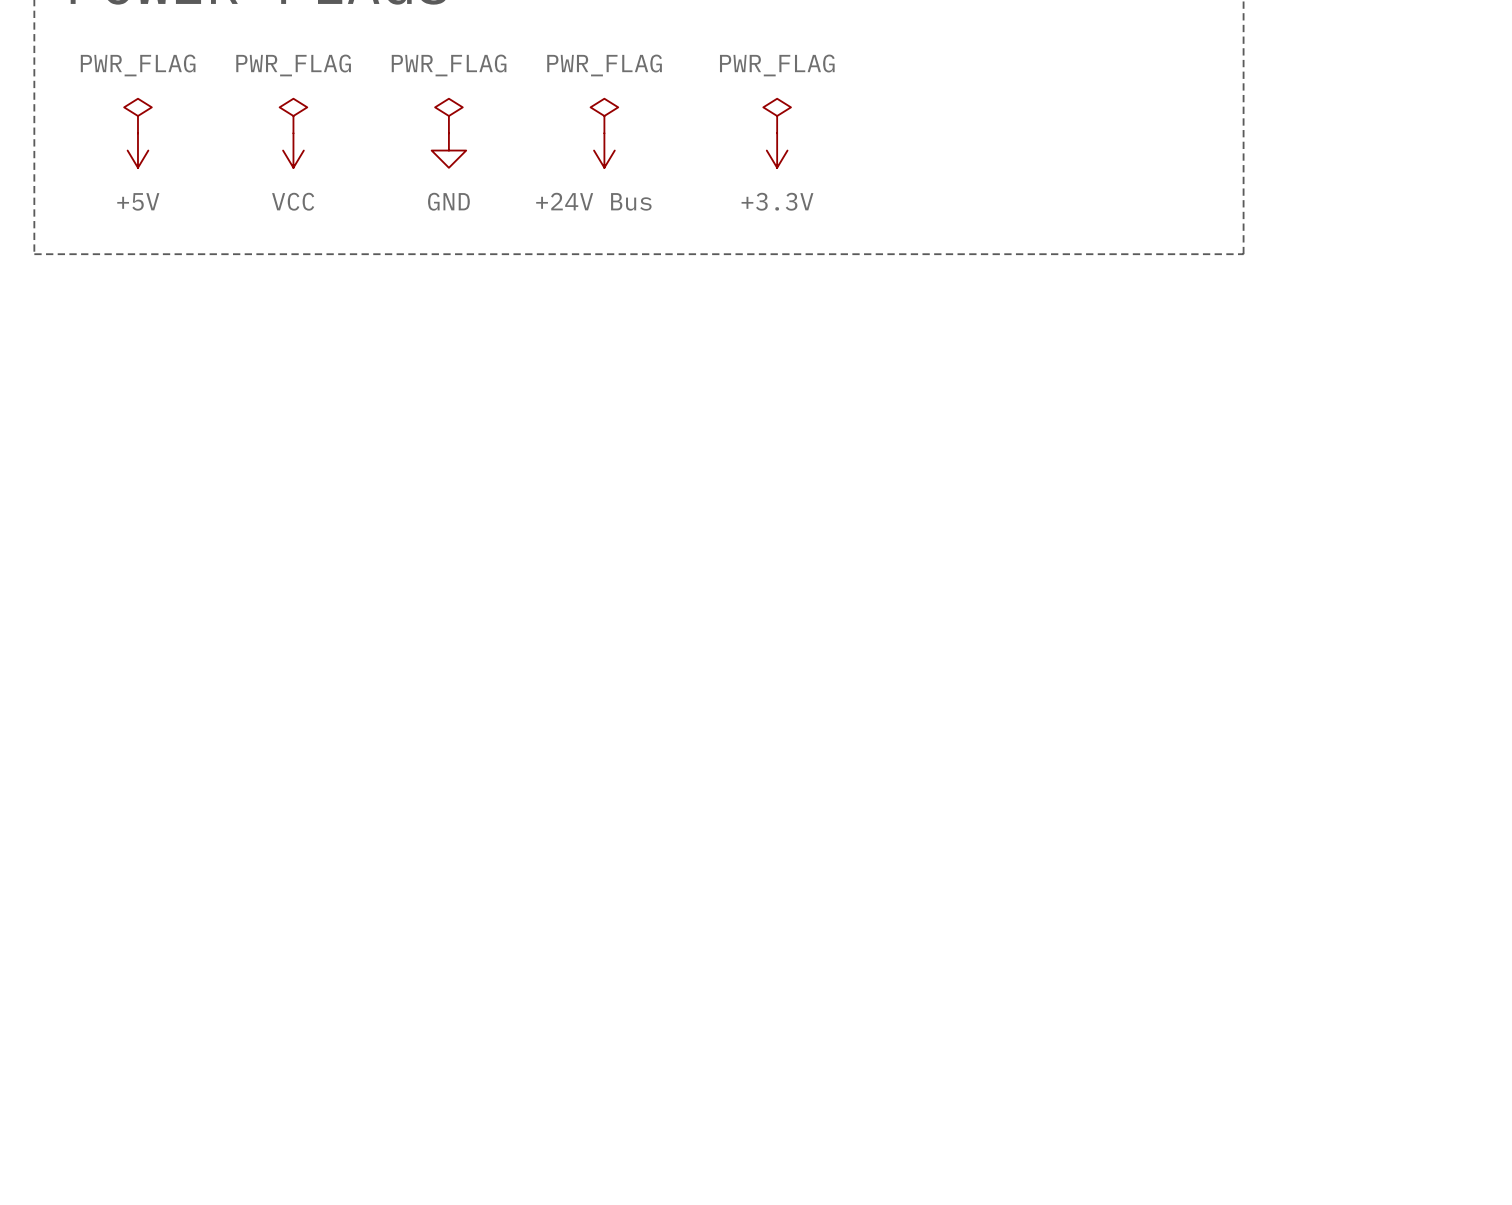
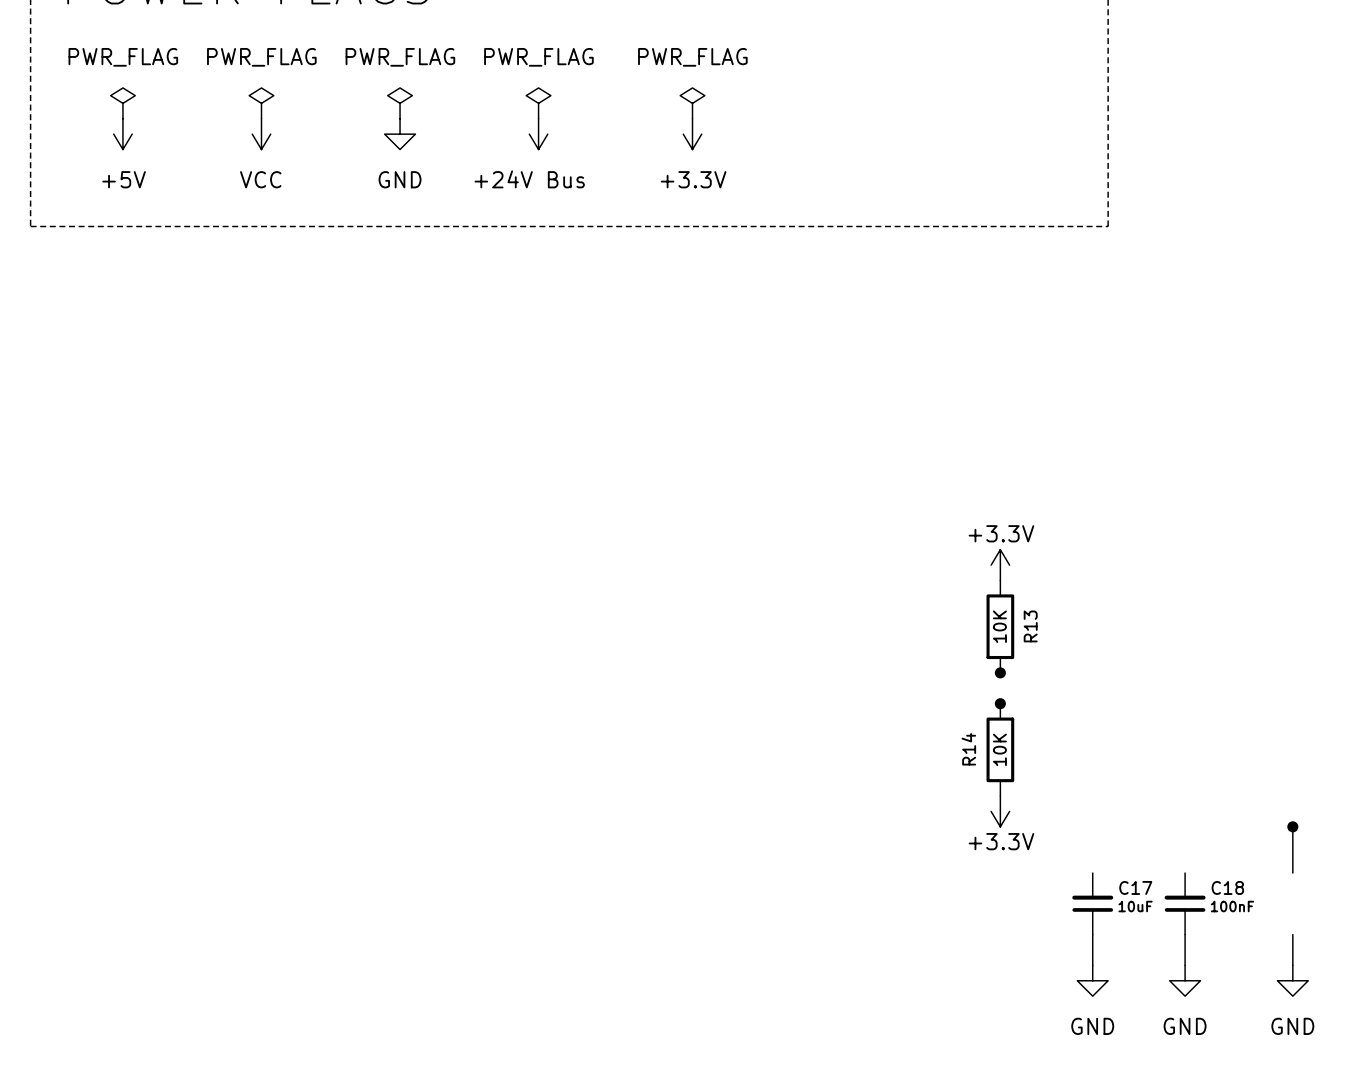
power symbol: none -> +3.3V (1000, 565)
R13: none -> 10K (1000, 626)
junction: none -> (1000, 672)
junction: none -> (1000, 703)
R14: none -> 10K (1000, 749)
power symbol: none -> +3.3V (1000, 811)
wire: none -> (1292, 826) (1292, 873)
junction: none -> (1292, 826)
C17: none -> 10uF (1092, 903)
C18: none -> 100nF (1185, 903)
wire: none -> (1092, 934) (1092, 965)
wire: none -> (1185, 934) (1185, 965)
wire: none -> (1292, 934) (1292, 965)
power symbol: none -> GND (1092, 980)
power symbol: none -> GND (1185, 980)
power symbol: none -> GND (1292, 980)

